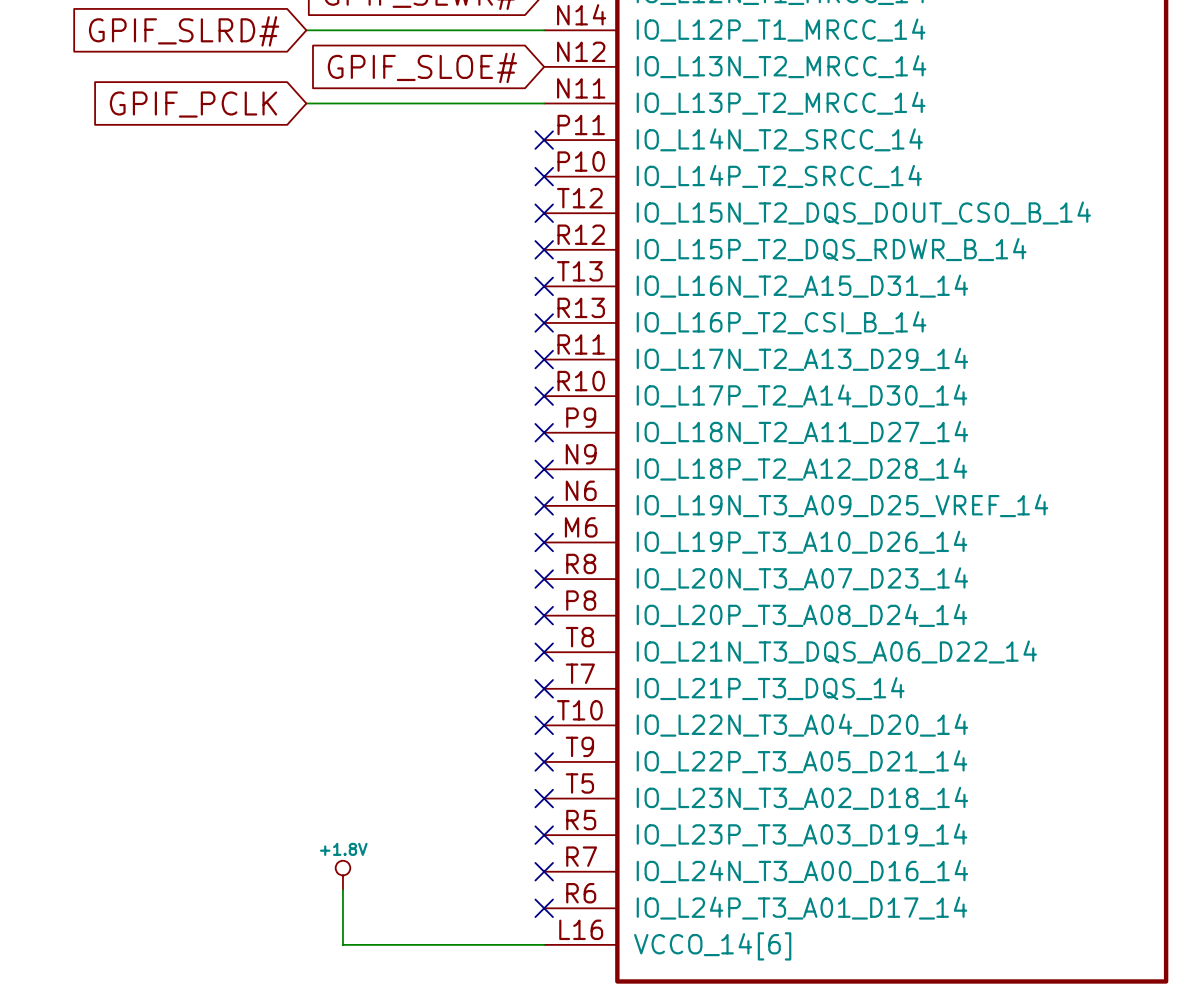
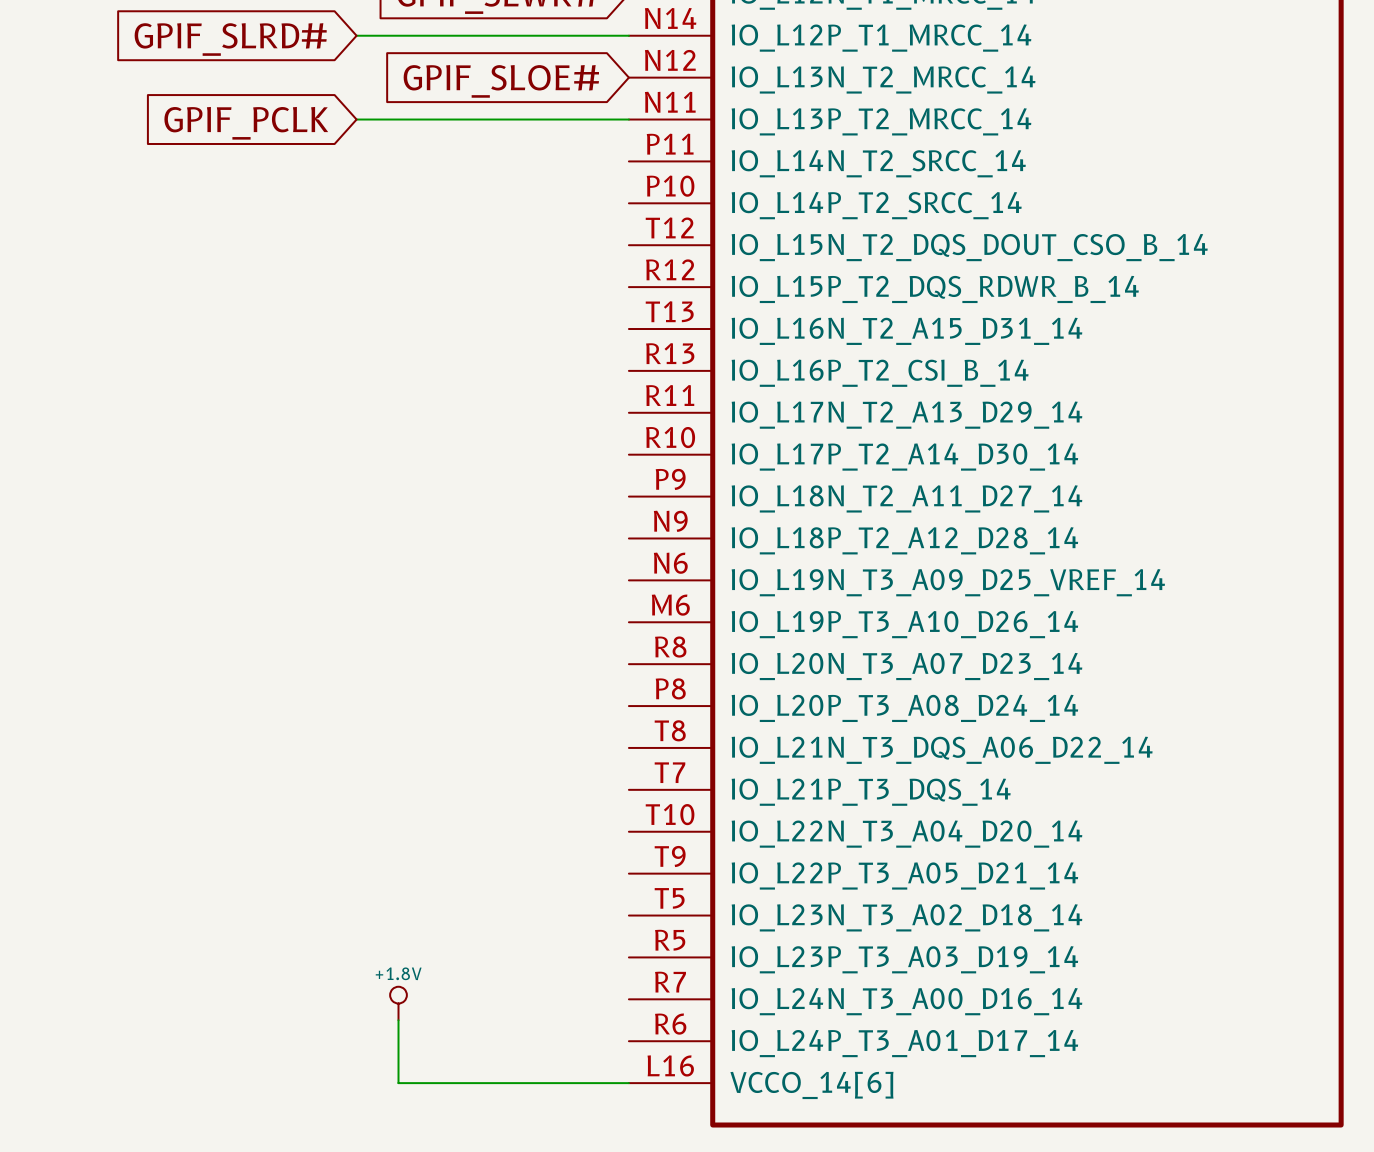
no-connect mark: (544, 140) -> none
no-connect mark: (544, 176) -> none
no-connect mark: (544, 213) -> none
no-connect mark: (544, 249) -> none
no-connect mark: (544, 286) -> none
no-connect mark: (544, 322) -> none
no-connect mark: (544, 359) -> none
no-connect mark: (544, 396) -> none
no-connect mark: (544, 432) -> none
no-connect mark: (544, 469) -> none
no-connect mark: (544, 505) -> none
no-connect mark: (544, 542) -> none
no-connect mark: (544, 579) -> none
no-connect mark: (544, 615) -> none
no-connect mark: (544, 652) -> none
no-connect mark: (544, 688) -> none
no-connect mark: (544, 725) -> none
no-connect mark: (544, 761) -> none
no-connect mark: (544, 798) -> none
no-connect mark: (544, 835) -> none
no-connect mark: (544, 871) -> none
no-connect mark: (544, 908) -> none

